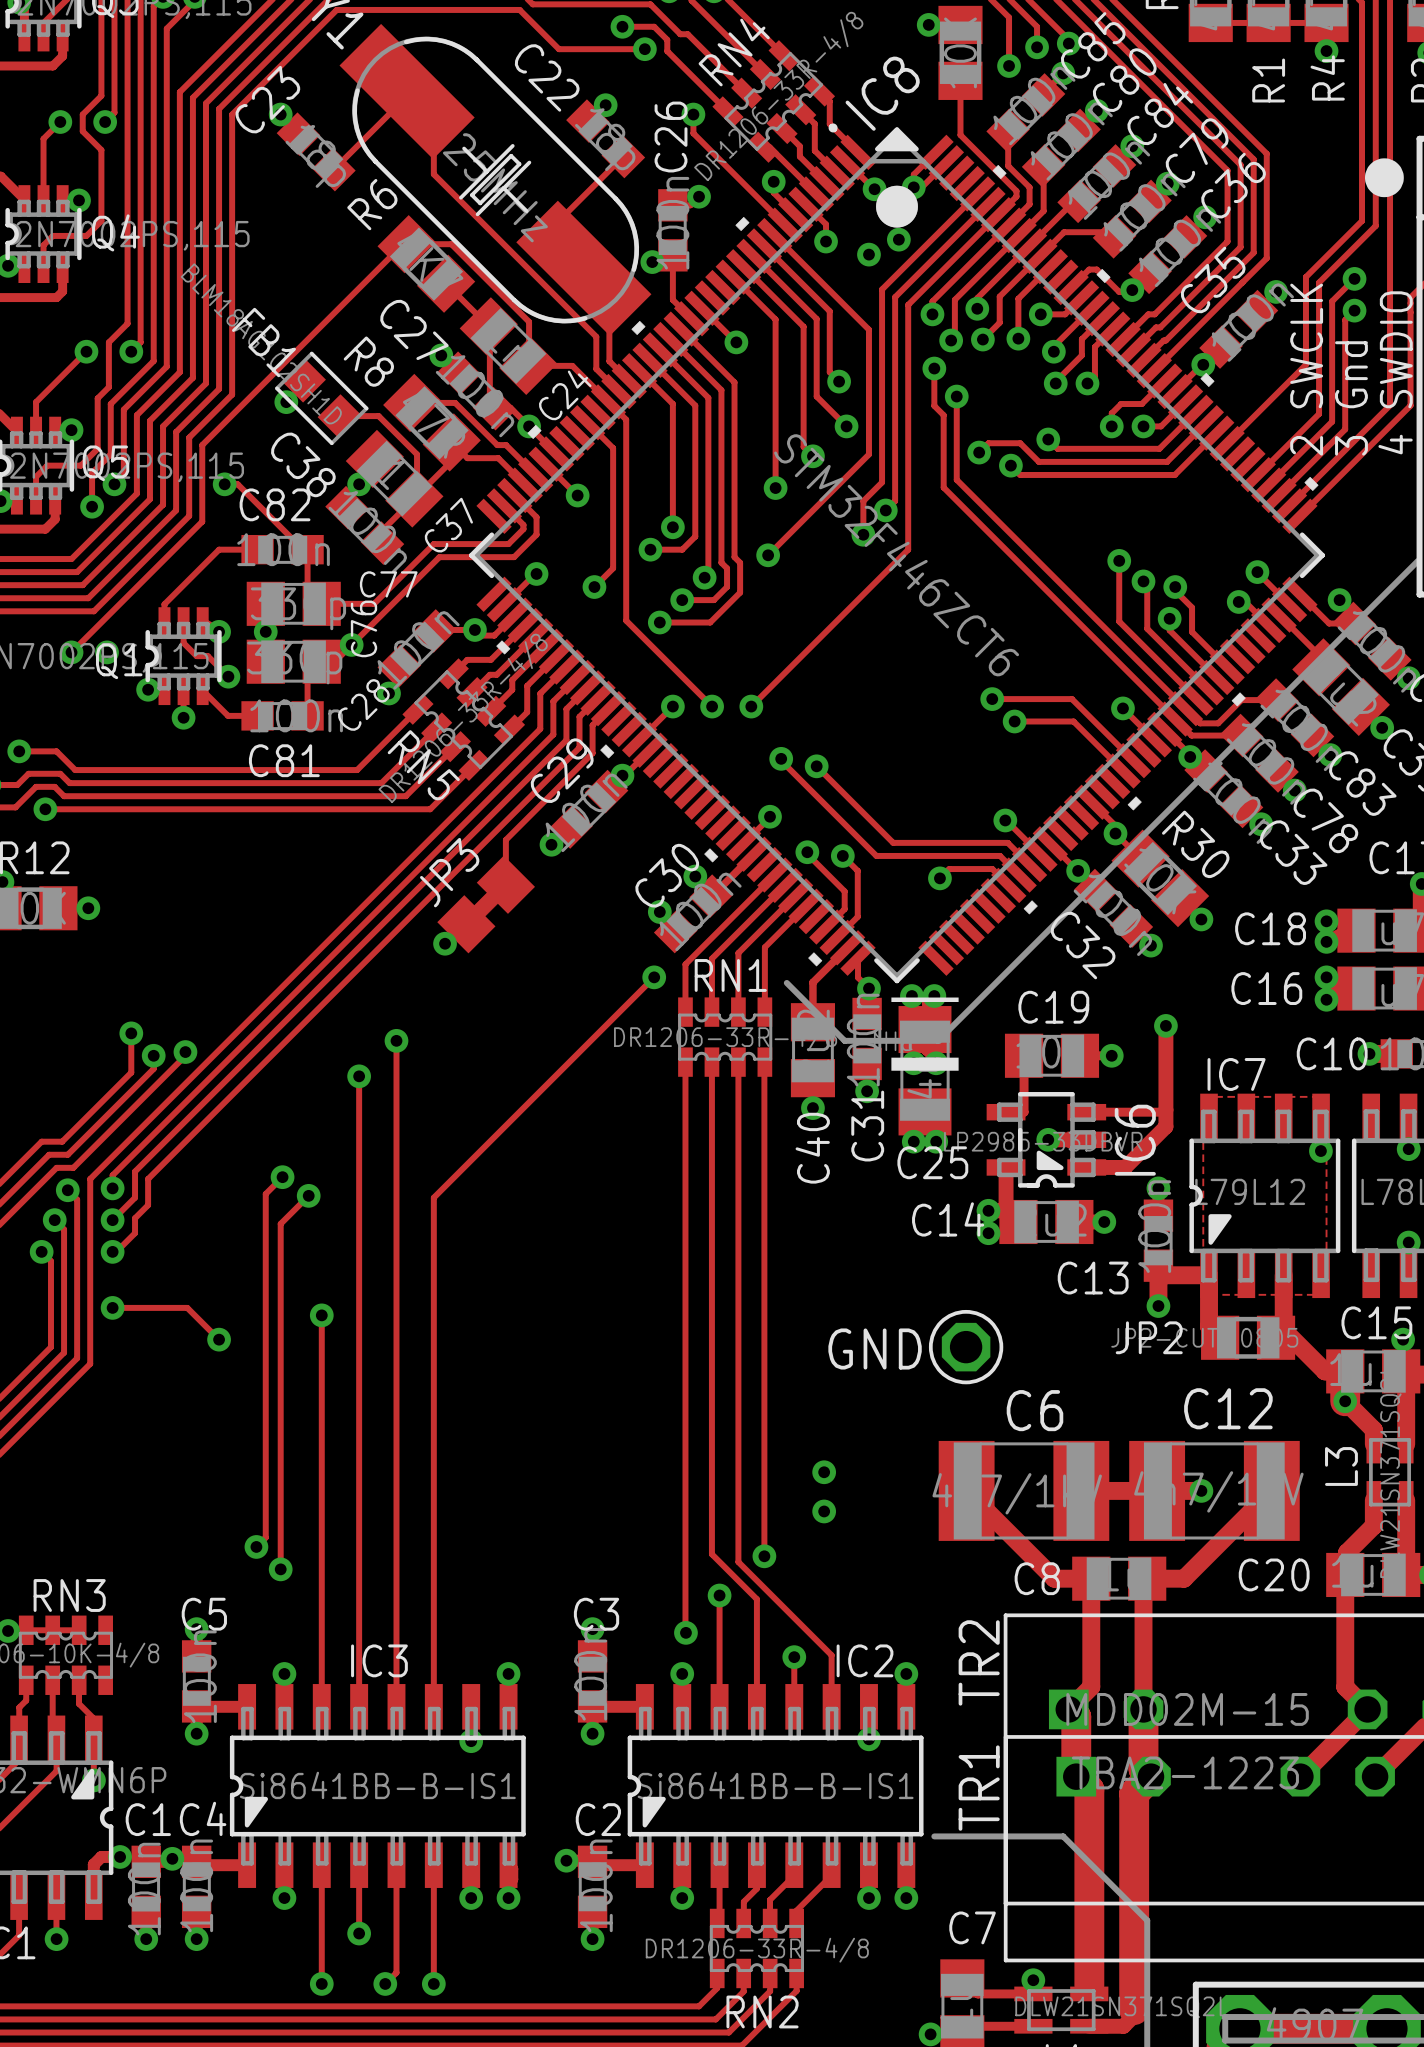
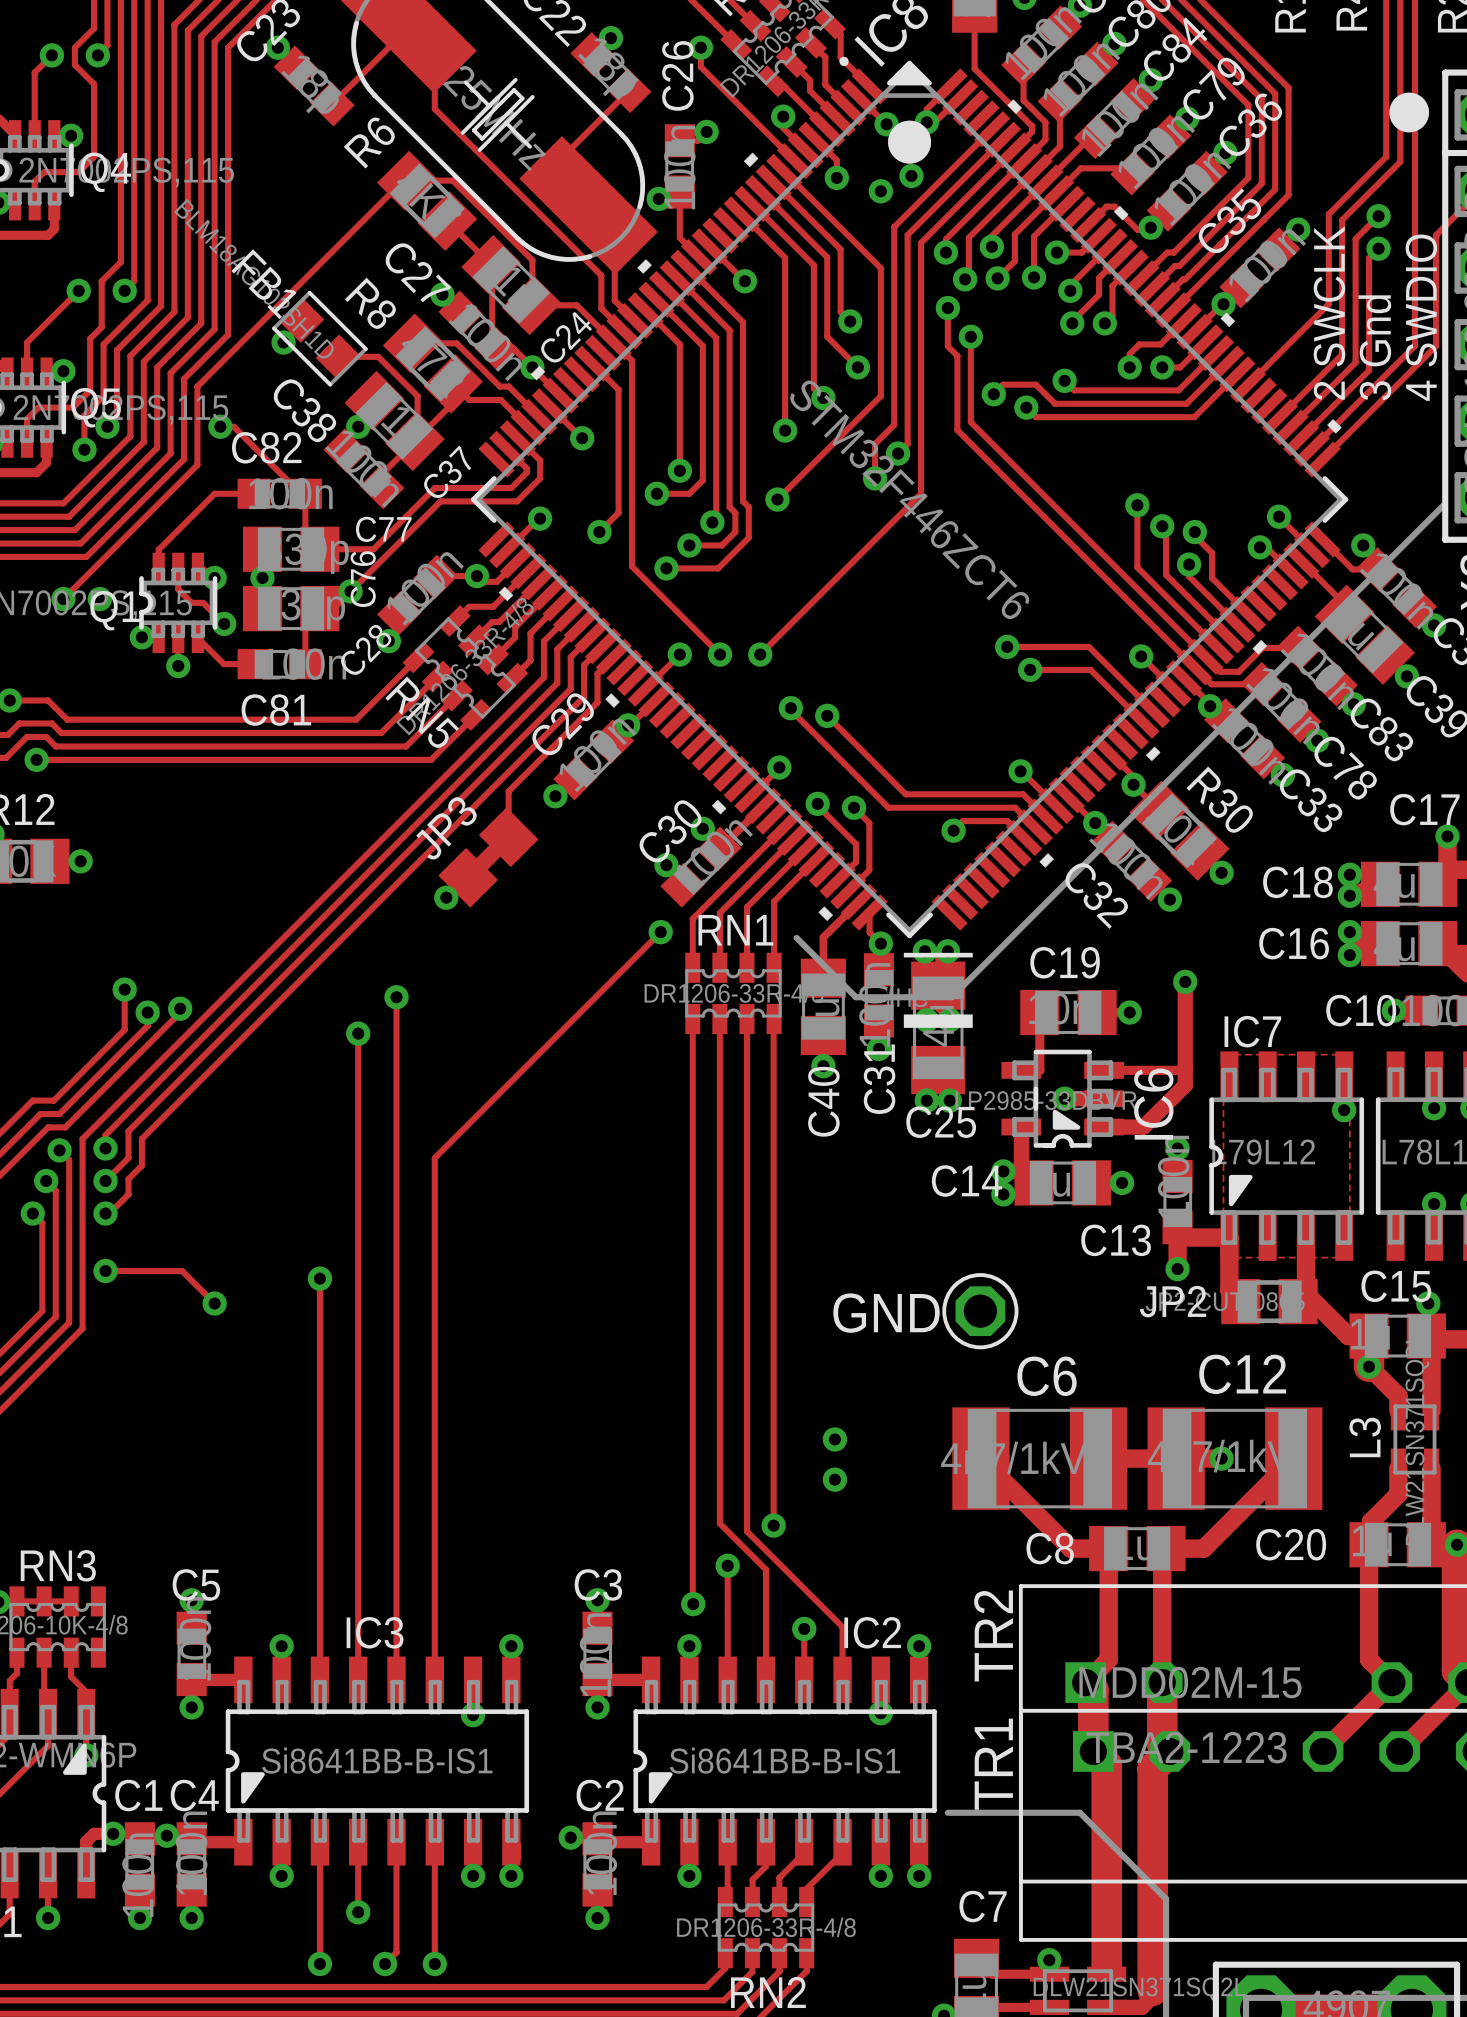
track: (282, 1177) (265, 1193) (265, 1537) (256, 1546) -> none
via: (282, 1177) -> none
track: (308, 1195) (280, 1223) (280, 1569) -> none
via: (308, 1195) -> none
via: (256, 1546) -> none
via: (280, 1569) -> none

